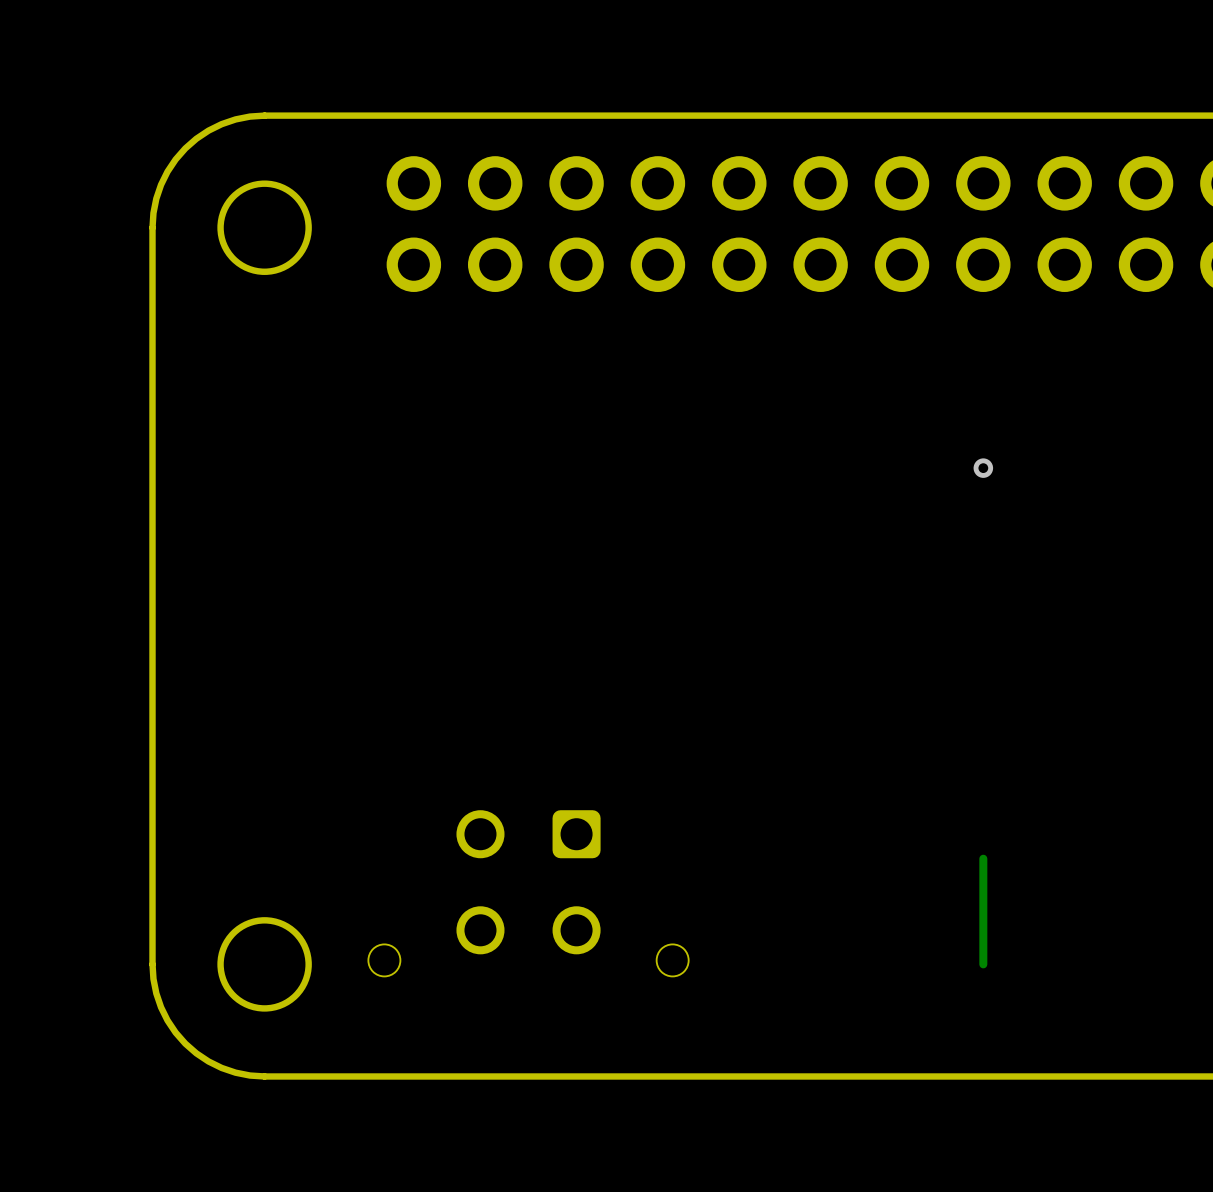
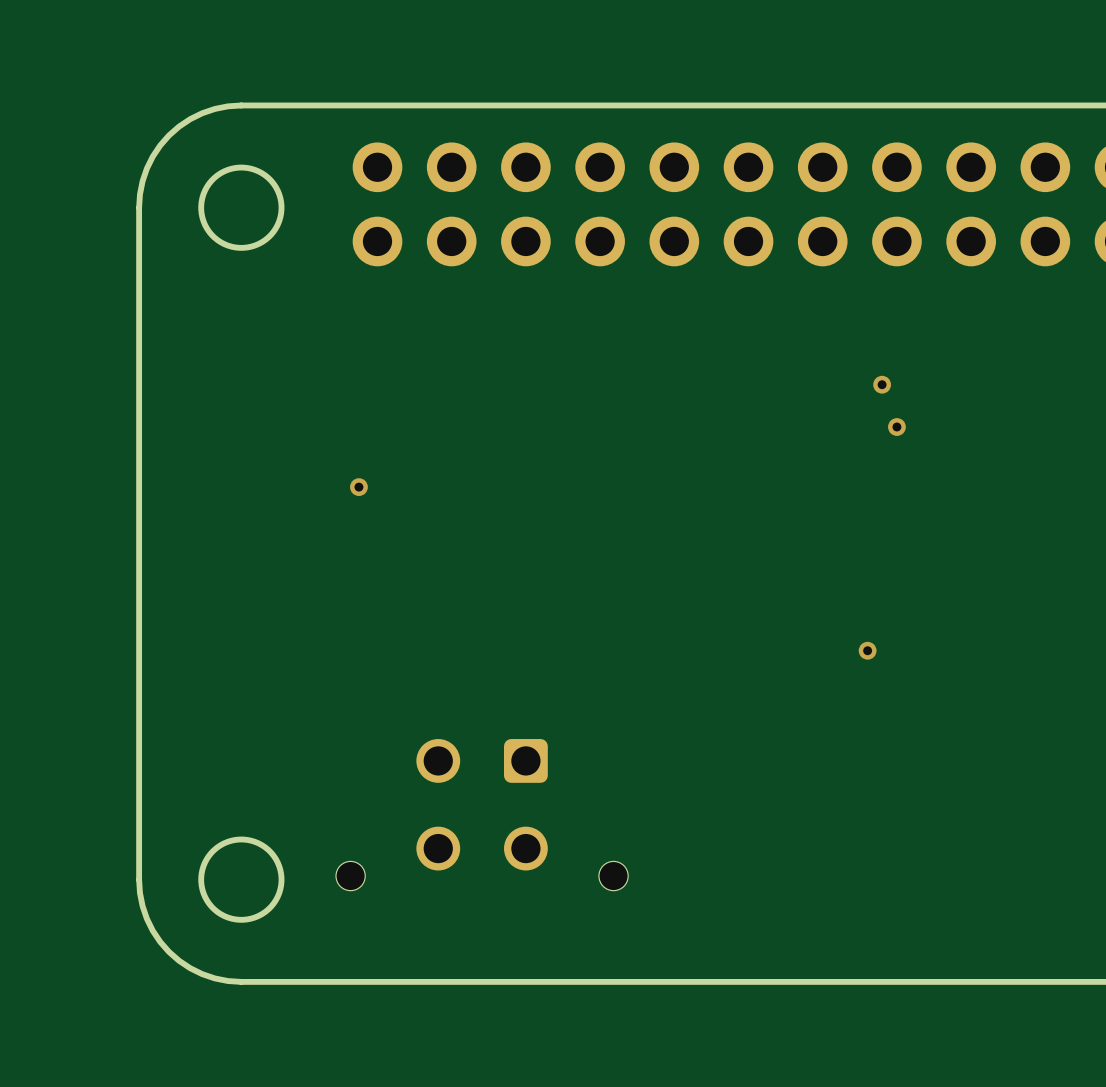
via: none -> (882, 384)
via: none -> (358, 487)
via: none -> (867, 650)
track: (983, 858) (983, 964) -> none

